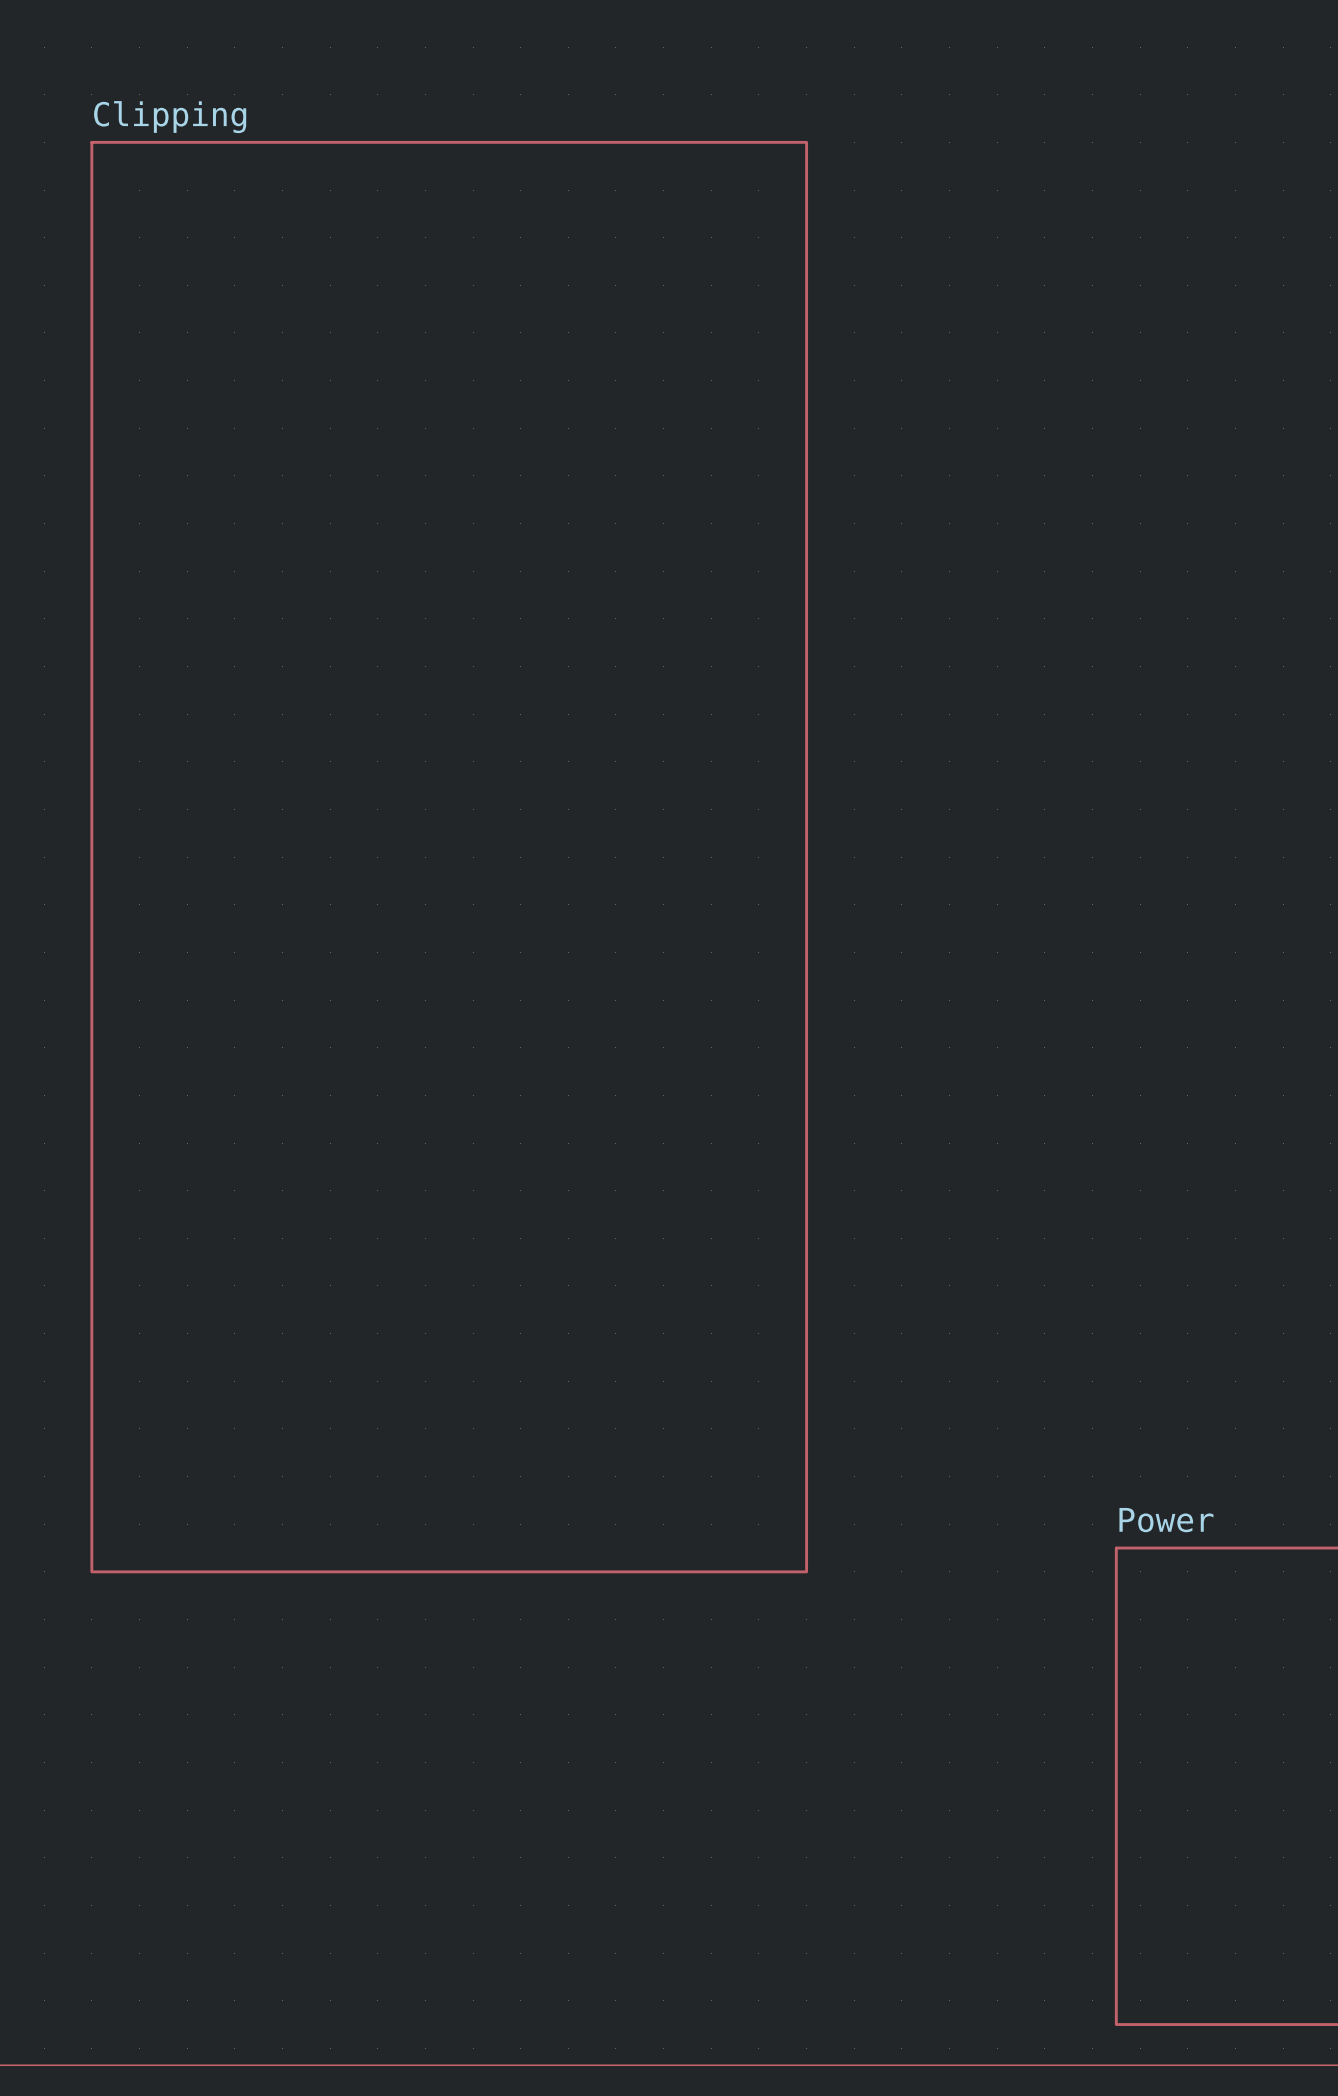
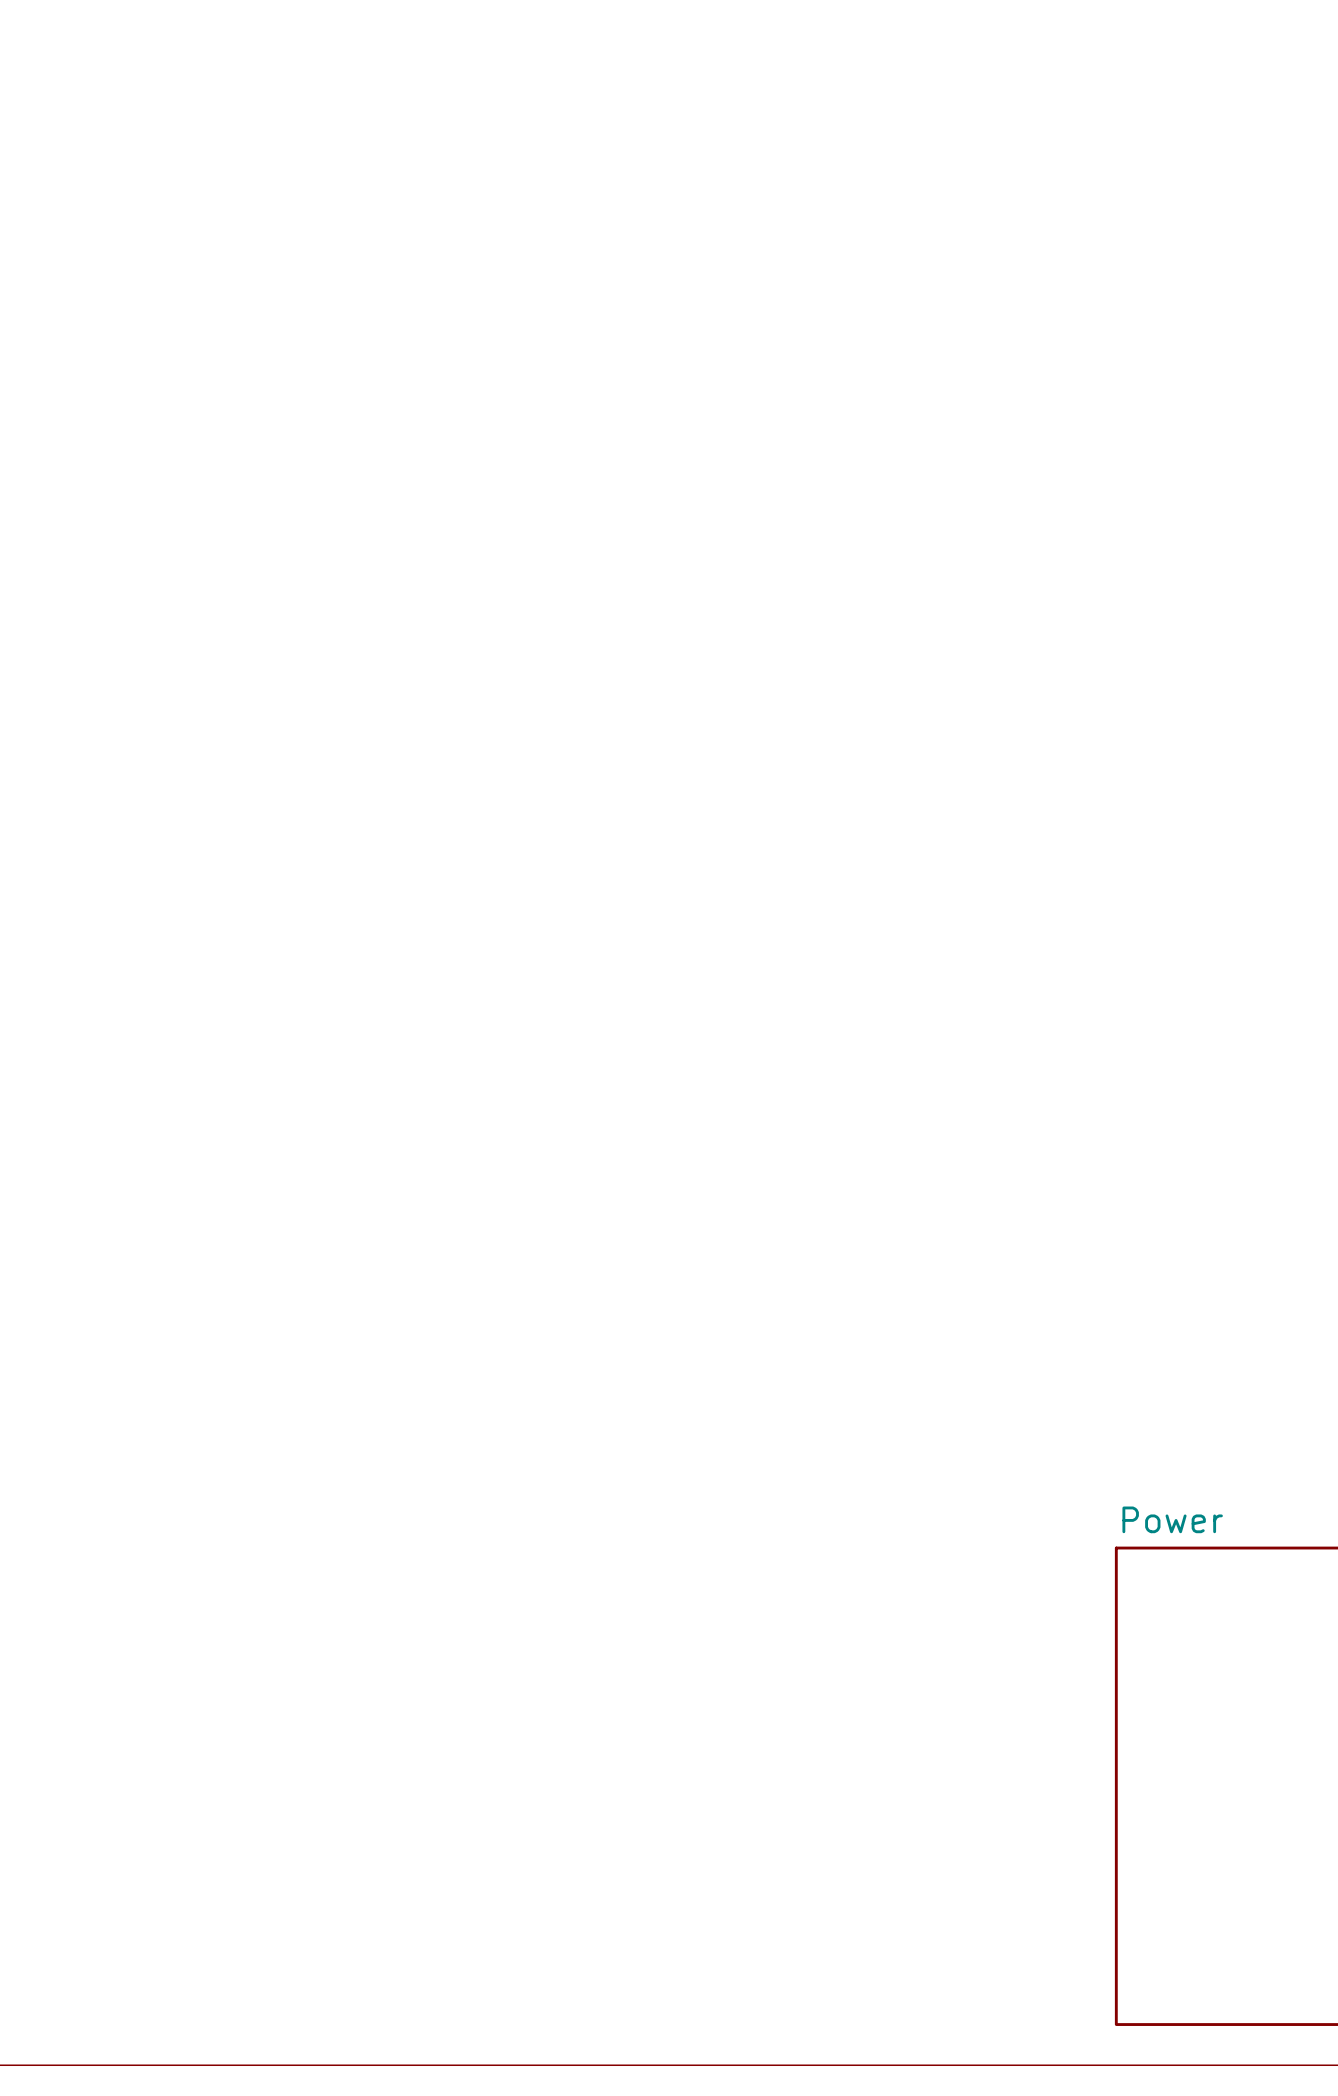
sheet Clipping: (449, 857) -> none

